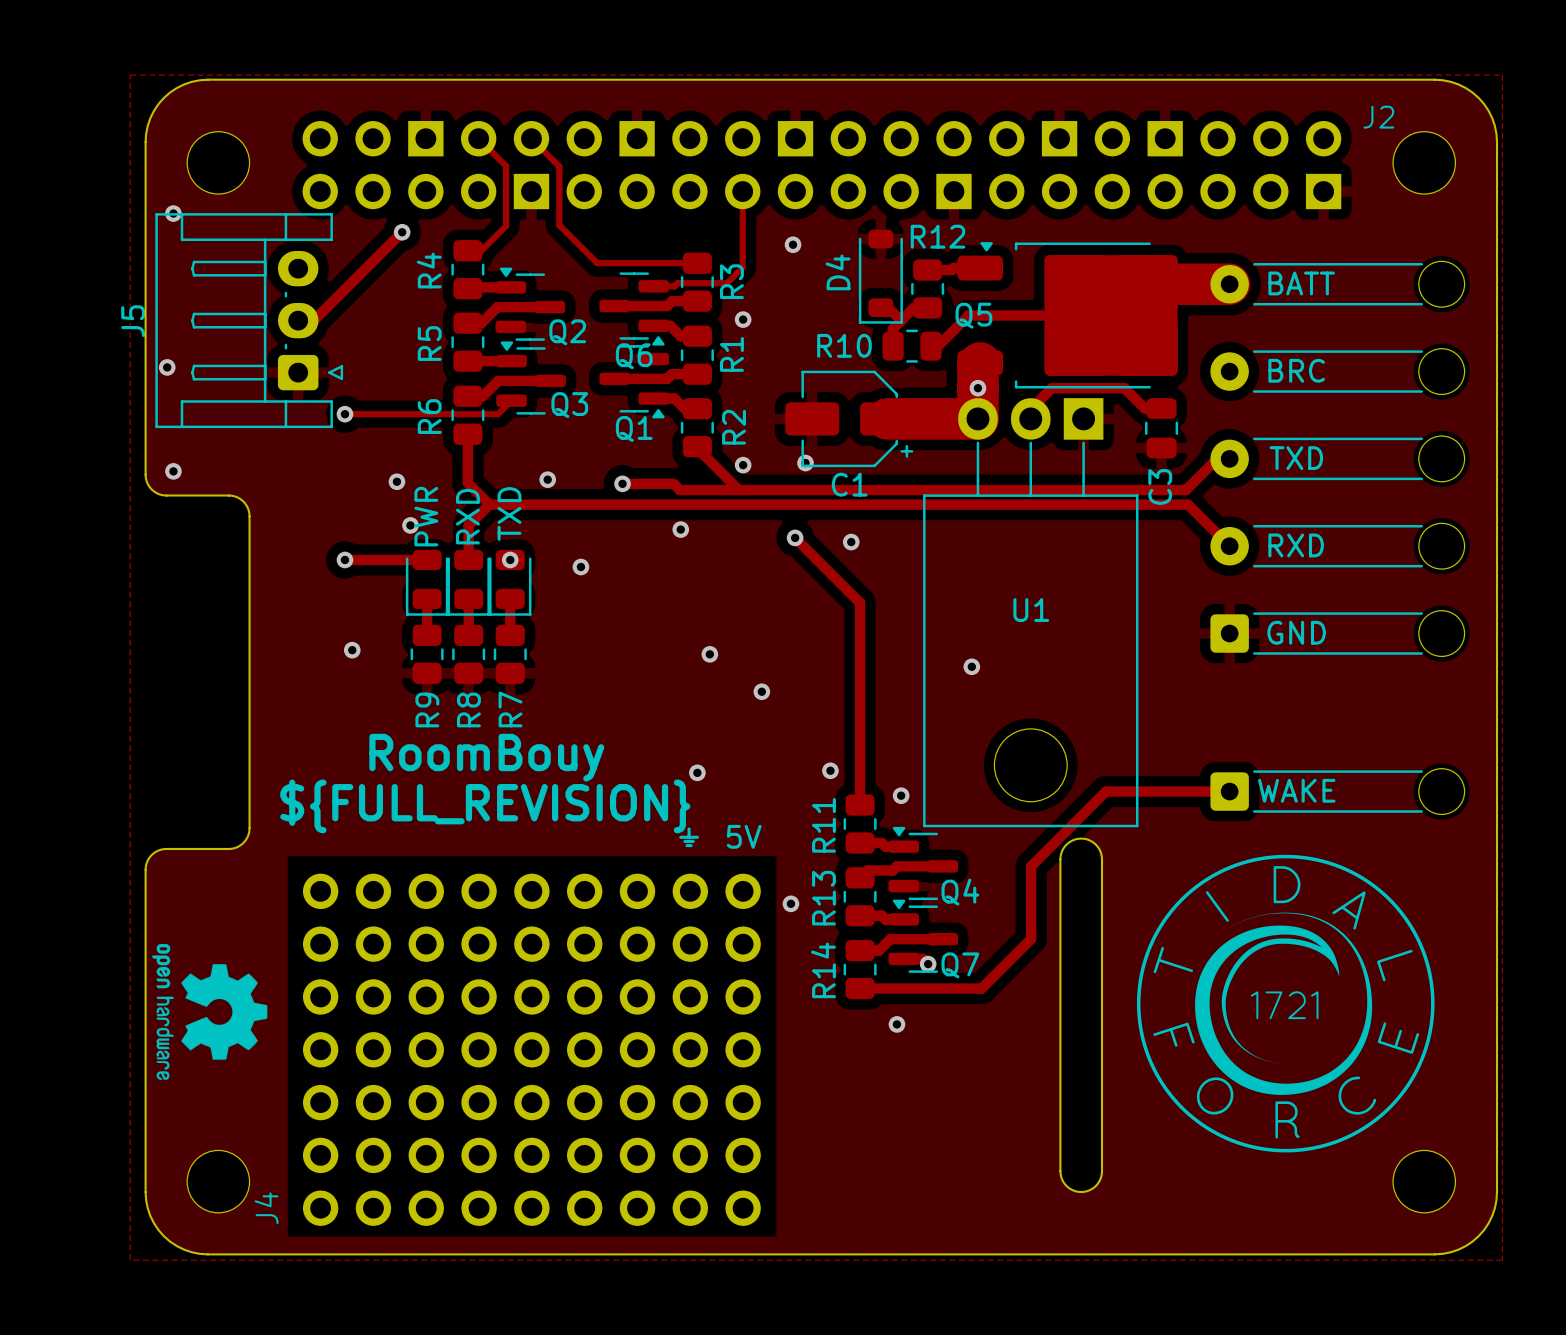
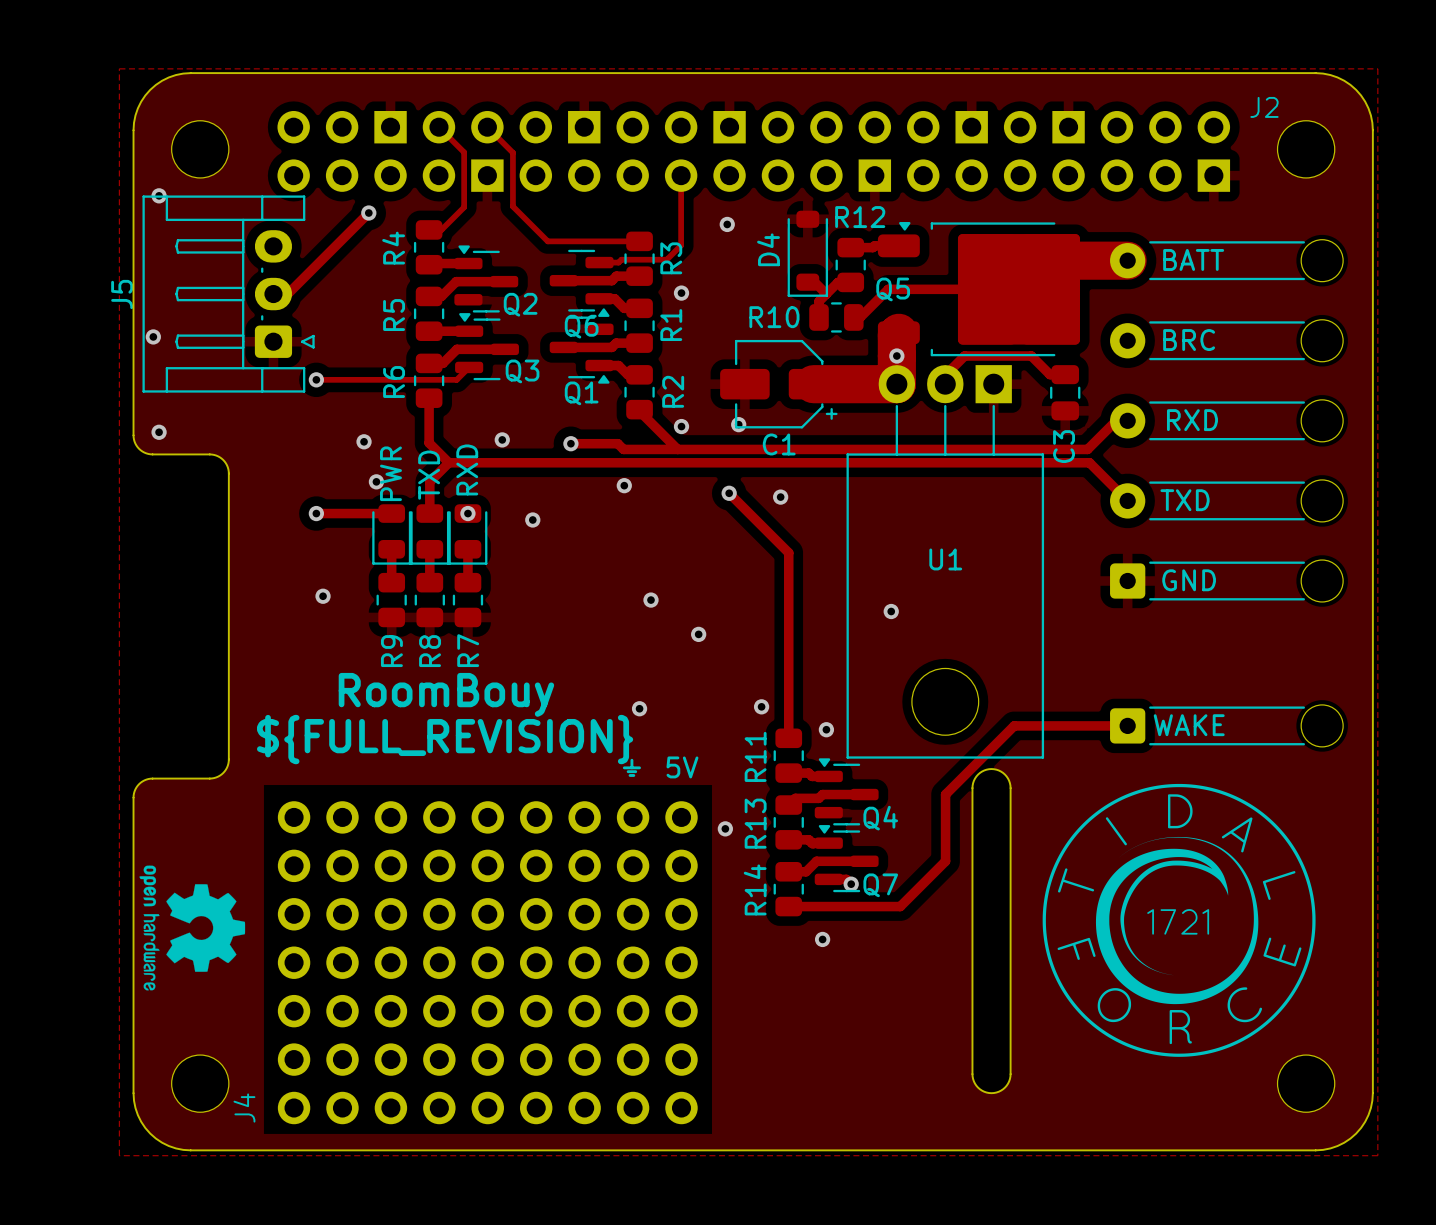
text: TXD (1296, 458) -> RXD (1192, 420)
part value: TXD (509, 513) -> RXD (467, 469)
part value: RXD (467, 516) -> TXD (429, 475)
text: RXD (1296, 545) -> TXD (1185, 500)

